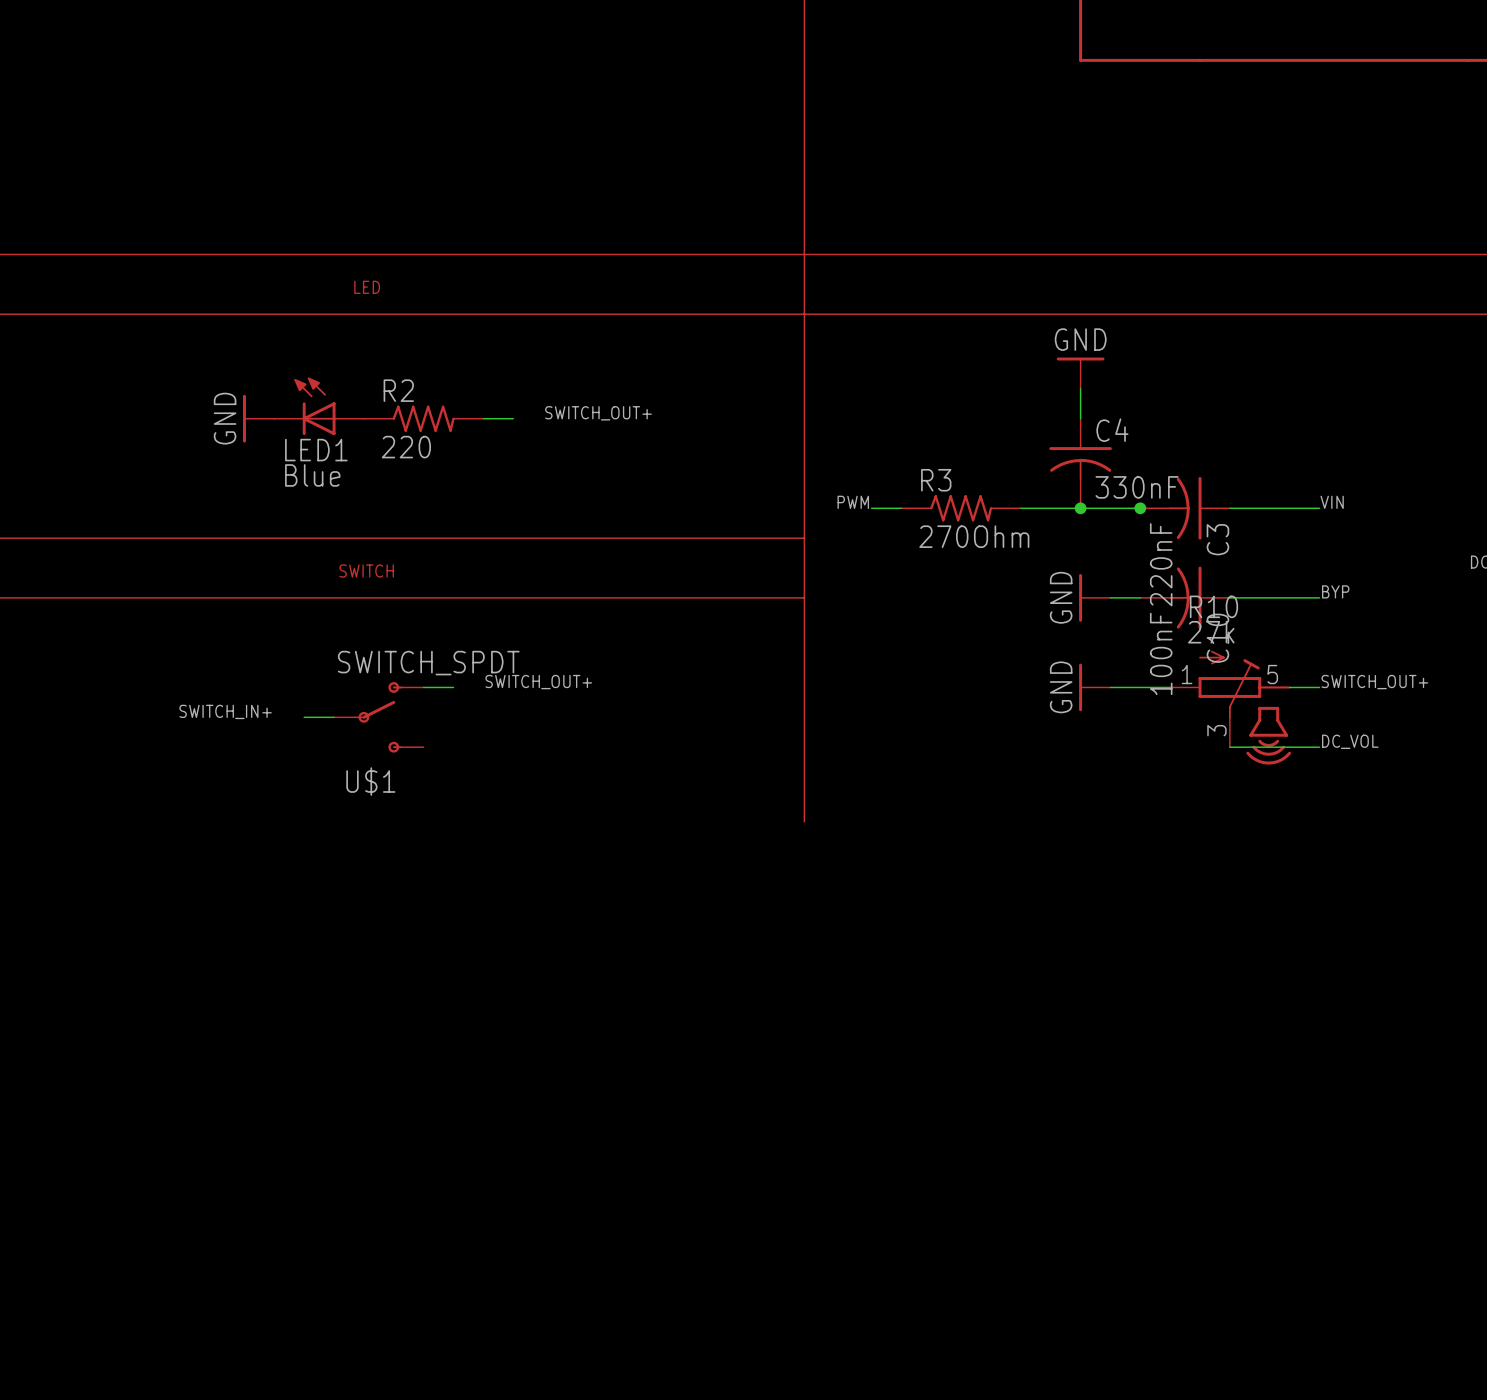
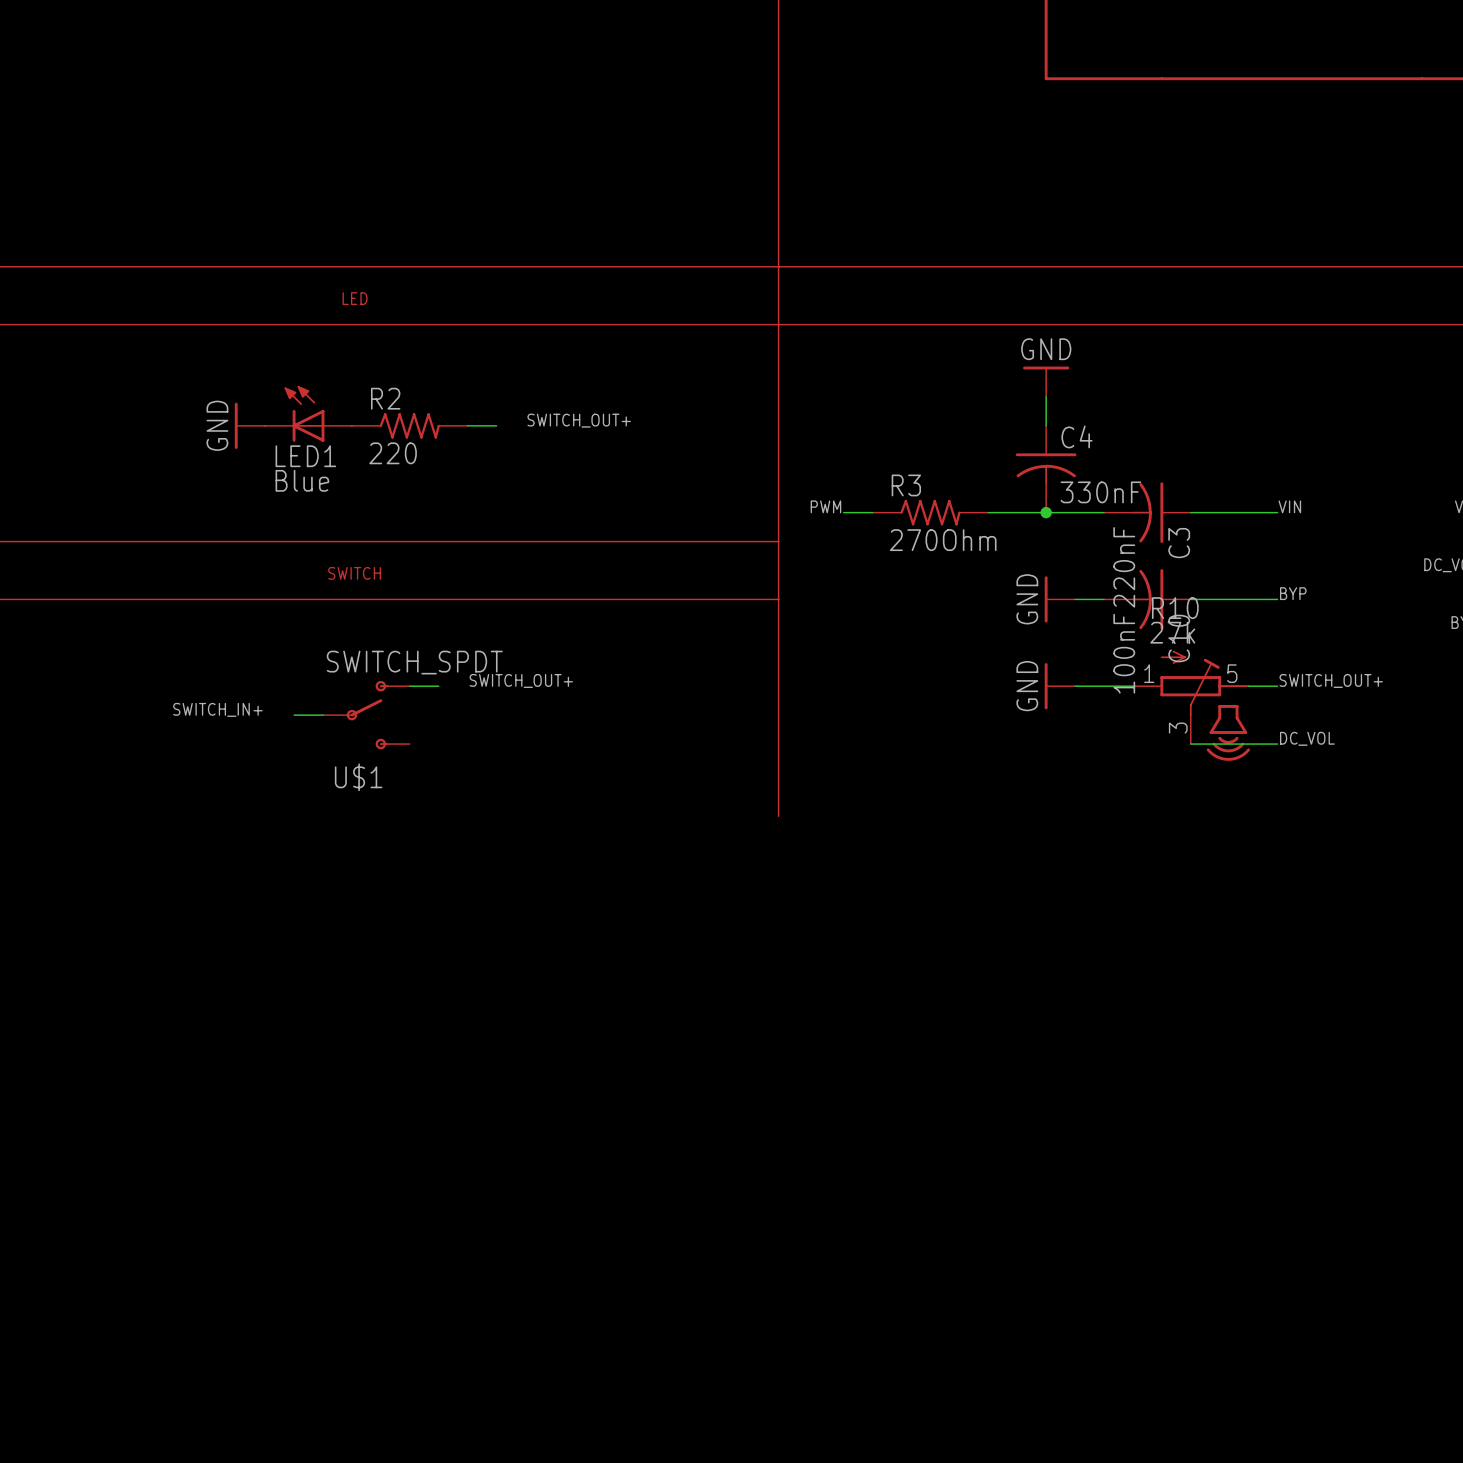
junction: (1140, 508) -> none

